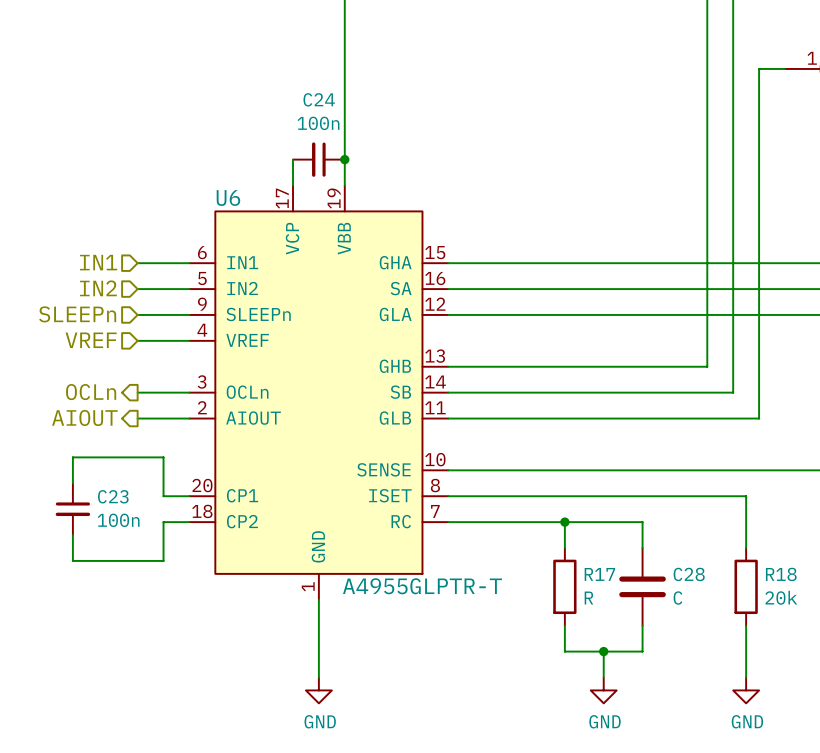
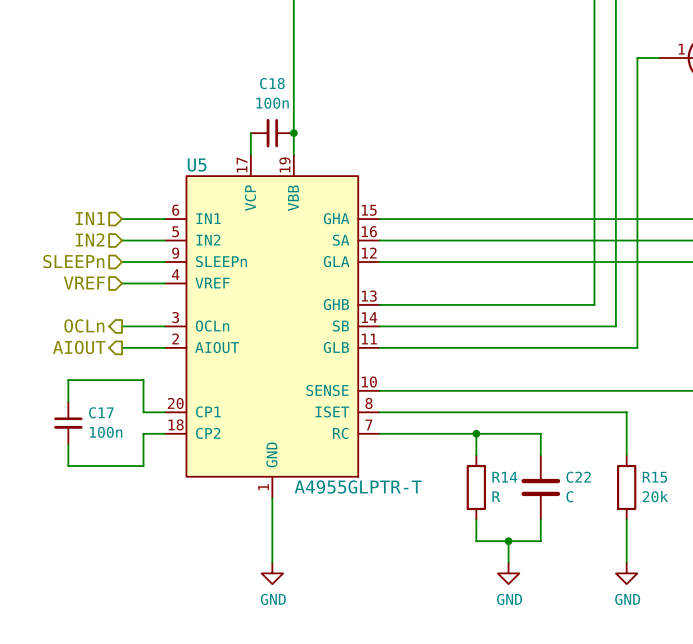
C24 name: C24 (319, 99) -> C18 (272, 83)
U6 name: U6 (228, 198) -> U5 (197, 165)
C23 name: C23 (113, 496) -> C17 (101, 412)
R17 name: R17 (599, 574) -> R14 (504, 477)
C28 name: C28 (689, 574) -> C22 (578, 477)
R18 name: R18 (781, 574) -> R15 (654, 477)

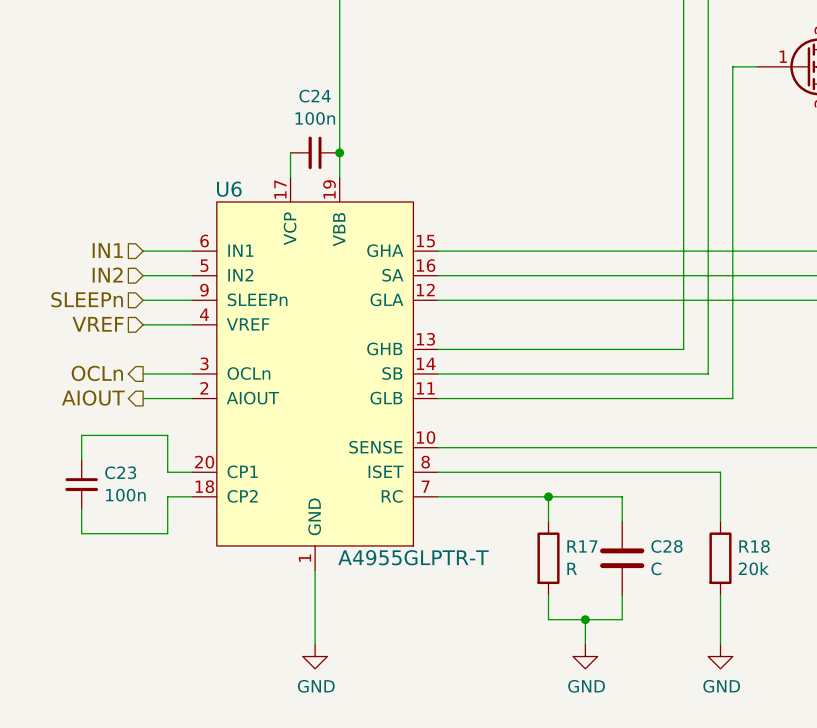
C18 name: C18 (272, 83) -> C24 (315, 96)
U5 name: U5 (197, 165) -> U6 (229, 189)
C17 name: C17 (101, 412) -> C23 (120, 472)
R14 name: R14 (504, 477) -> R17 (582, 546)
C22 name: C22 (578, 477) -> C28 (666, 546)
R15 name: R15 (654, 477) -> R18 (754, 546)

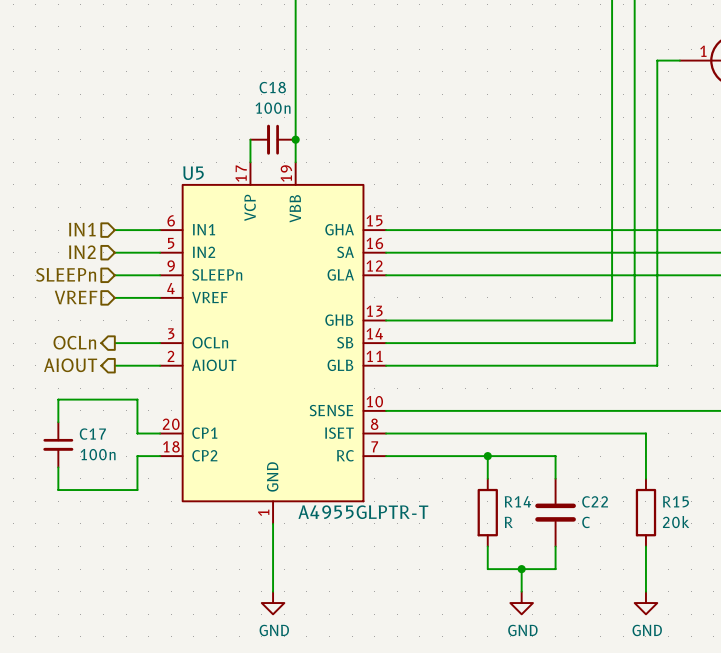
C24 name: C24 (315, 96) -> C18 (272, 87)
U6 name: U6 (229, 189) -> U5 (193, 173)
C23 name: C23 (120, 472) -> C17 (92, 434)
R17 name: R17 (582, 546) -> R14 (517, 501)
C28 name: C28 (666, 546) -> C22 (595, 501)
R18 name: R18 (754, 546) -> R15 (675, 501)

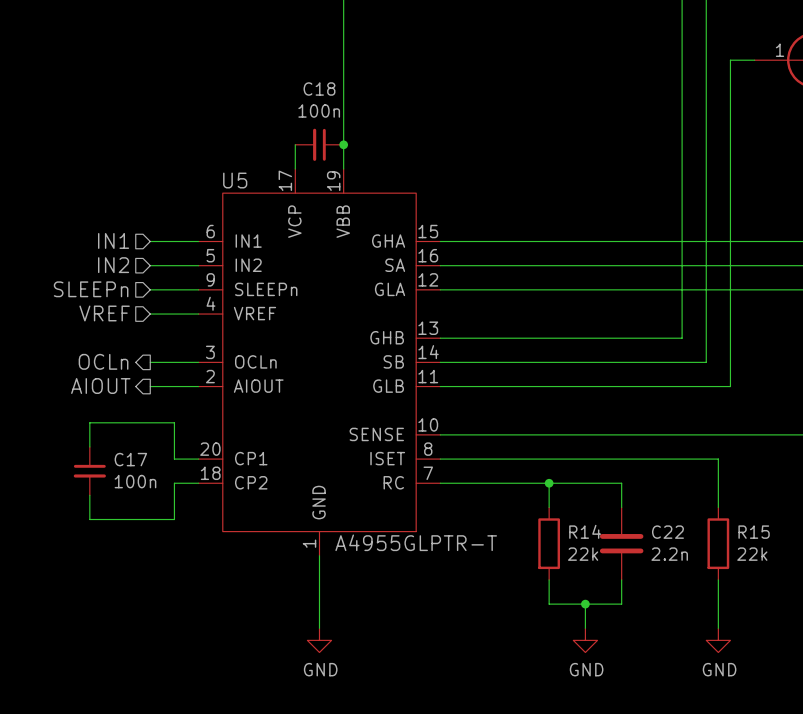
R14 value: R (508, 522) -> 22k (583, 554)
C22 value: C (586, 522) -> 2.2n (669, 554)
R15 value: 20k (676, 522) -> 22k (752, 554)

